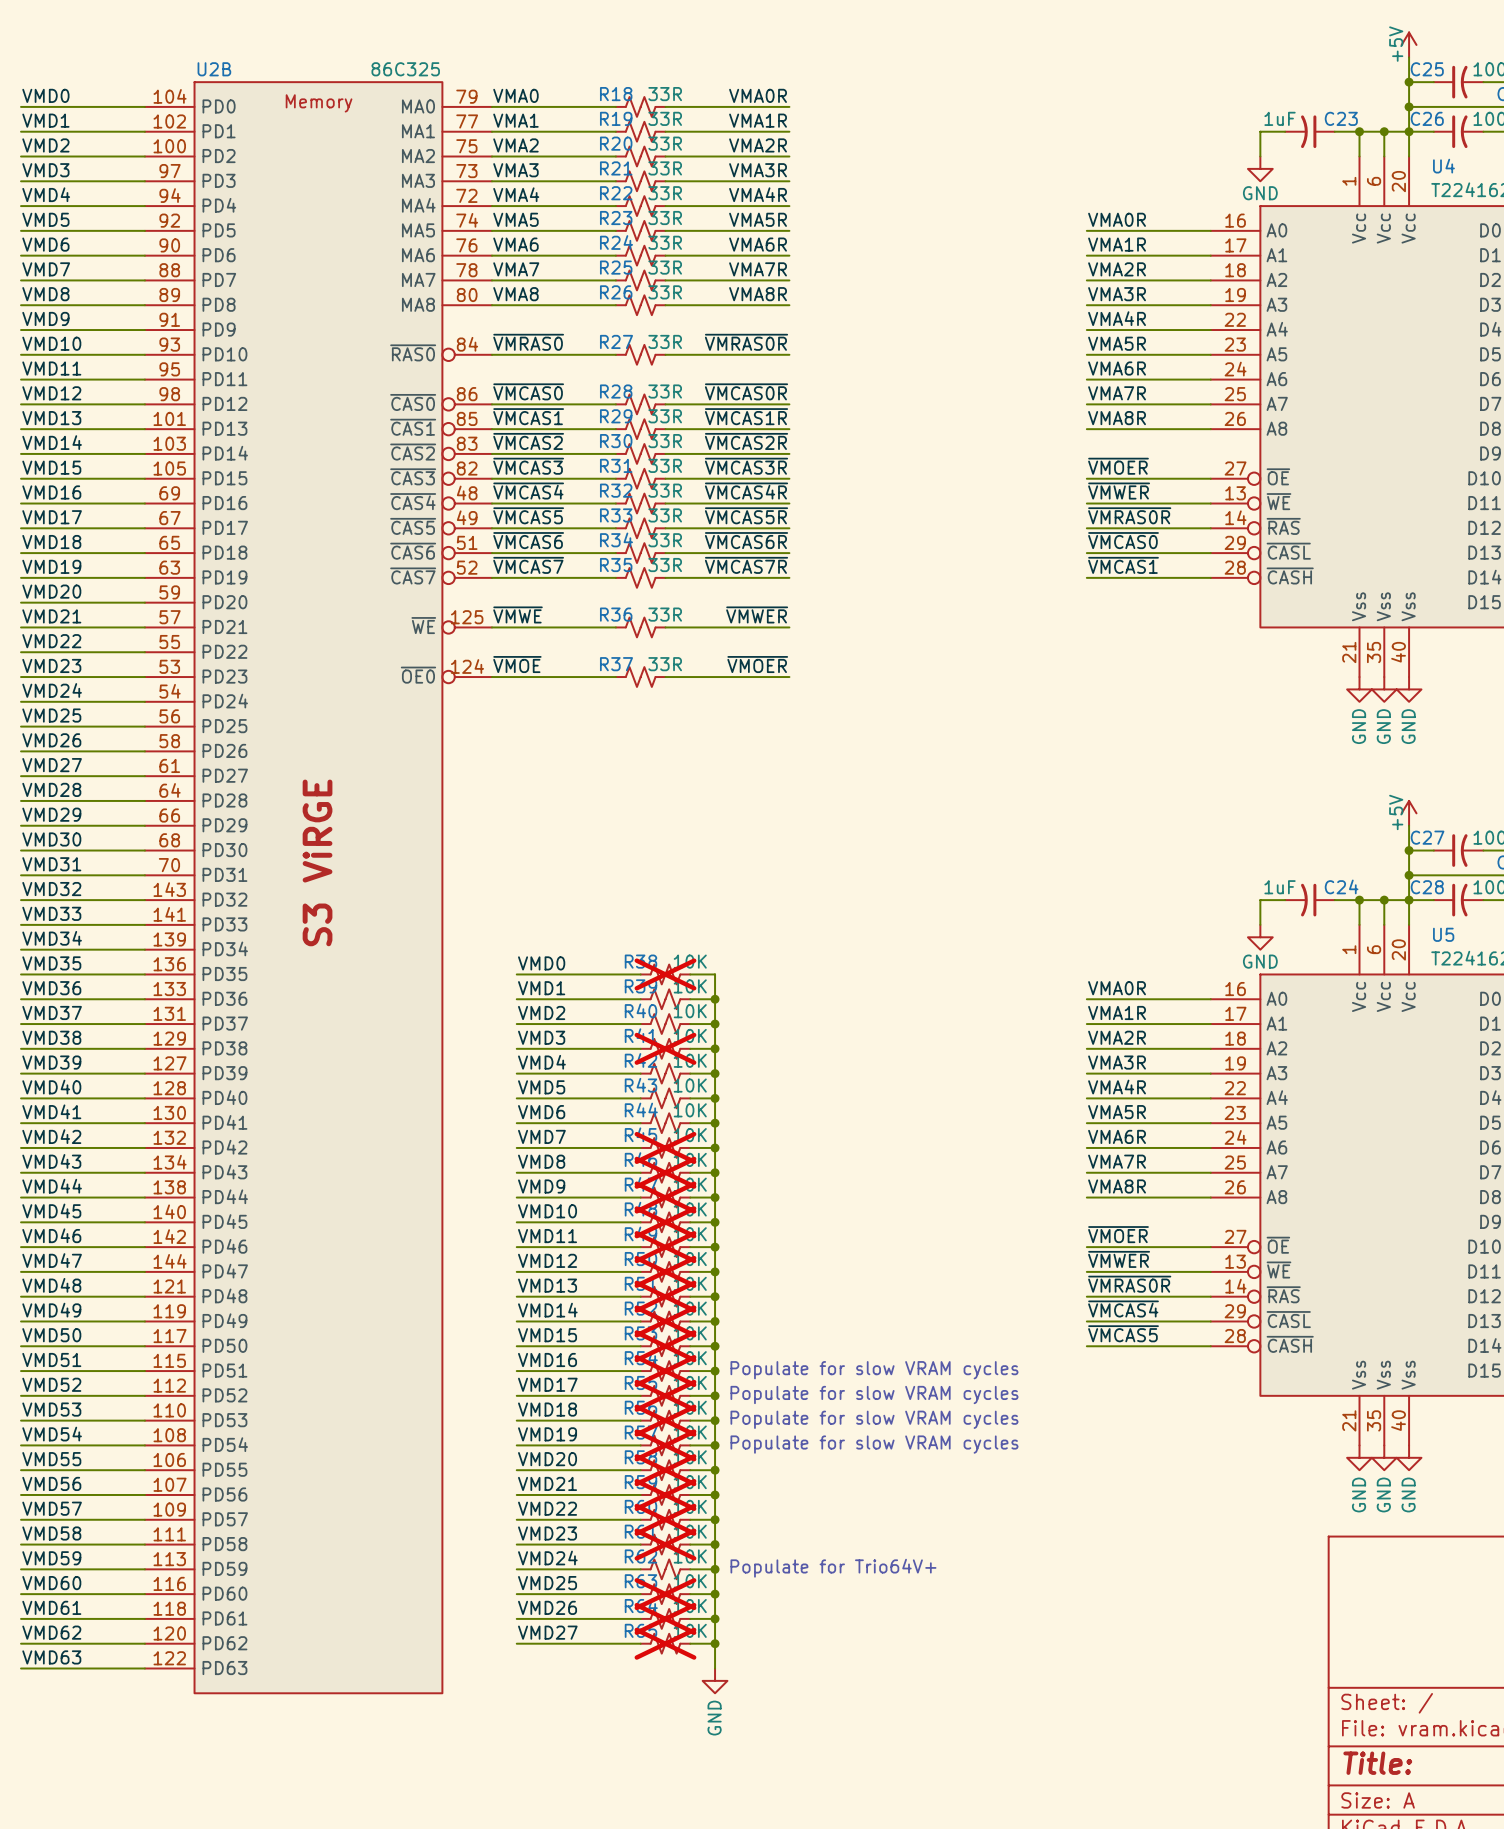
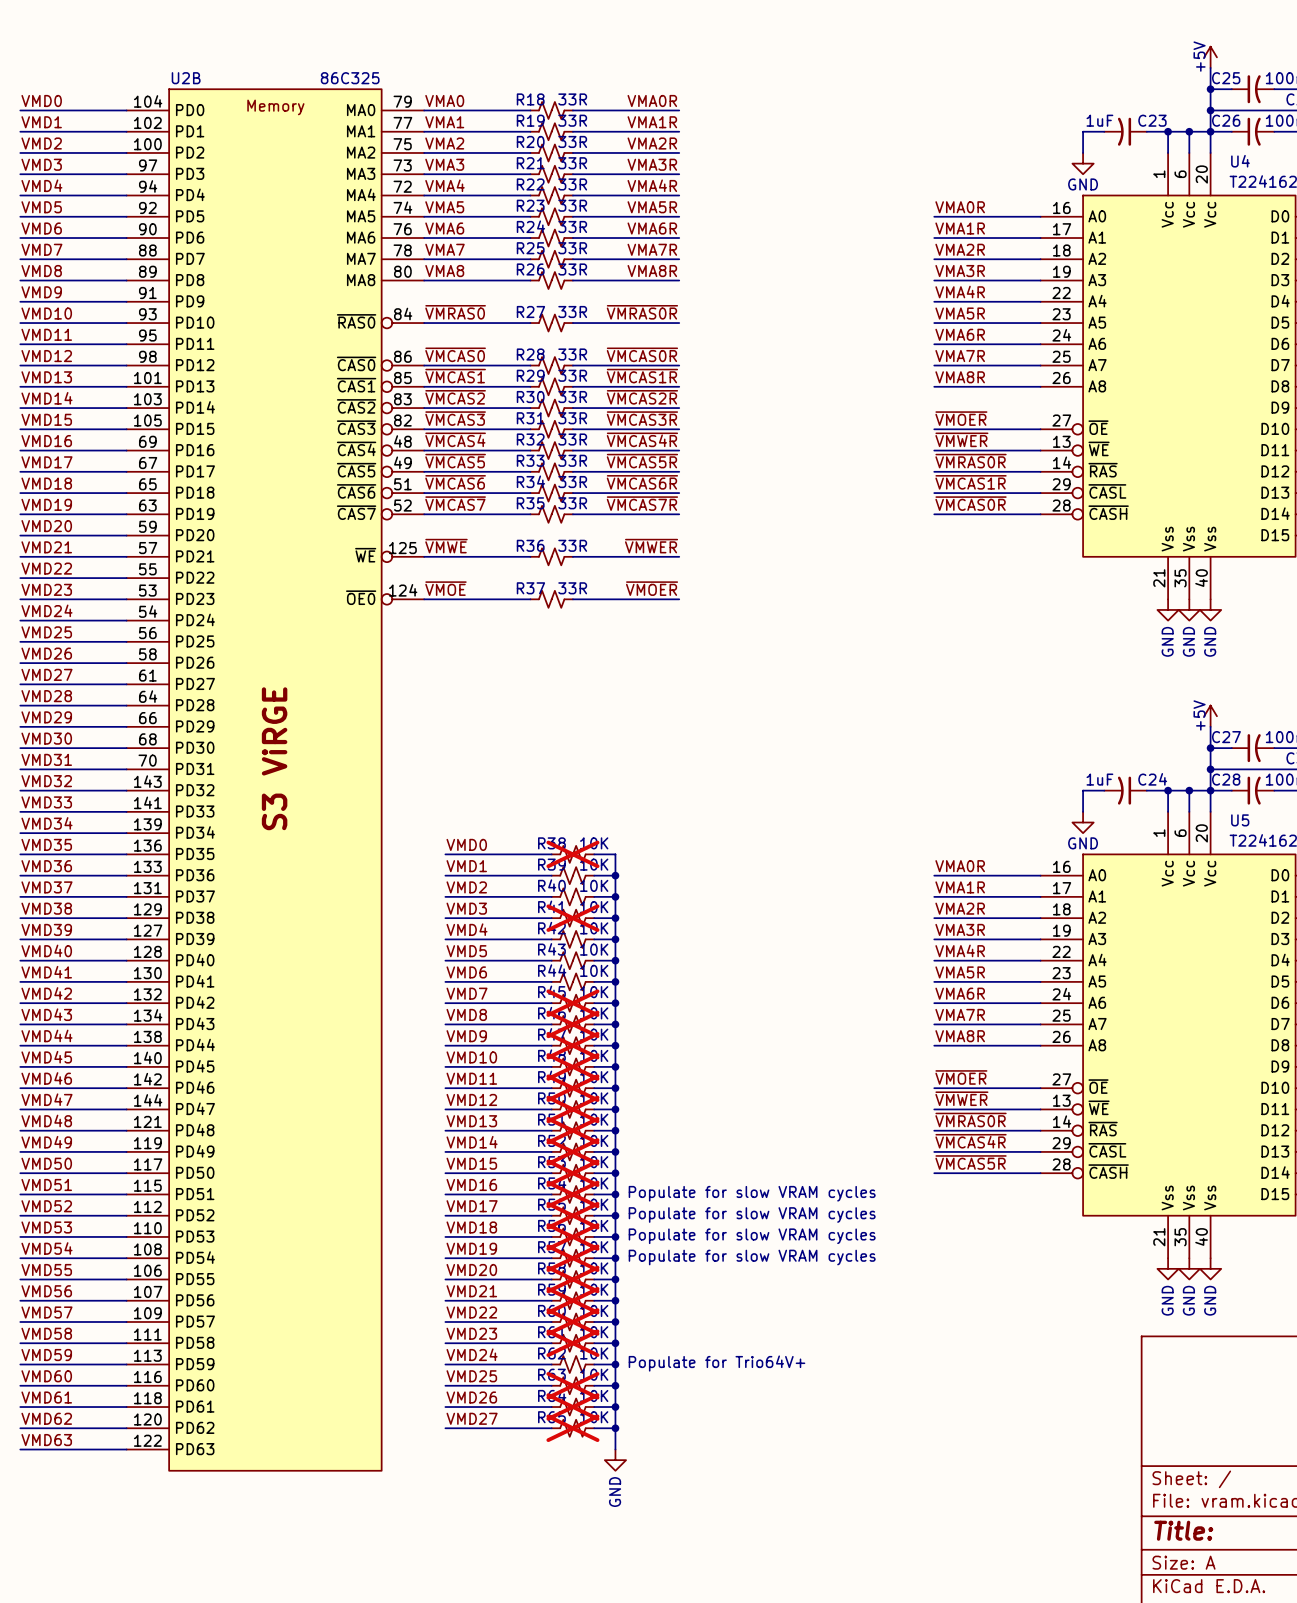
label: ~{VMCAS0} (1123, 540) -> ~{VMCAS1R} (971, 482)
label: ~{VMCAS1} (1123, 565) -> ~{VMCAS0R} (971, 503)
label: ~{VMCAS4} (1123, 1308) -> ~{VMCAS4R} (971, 1141)
label: ~{VMCAS5} (1123, 1333) -> ~{VMCAS5R} (971, 1162)

